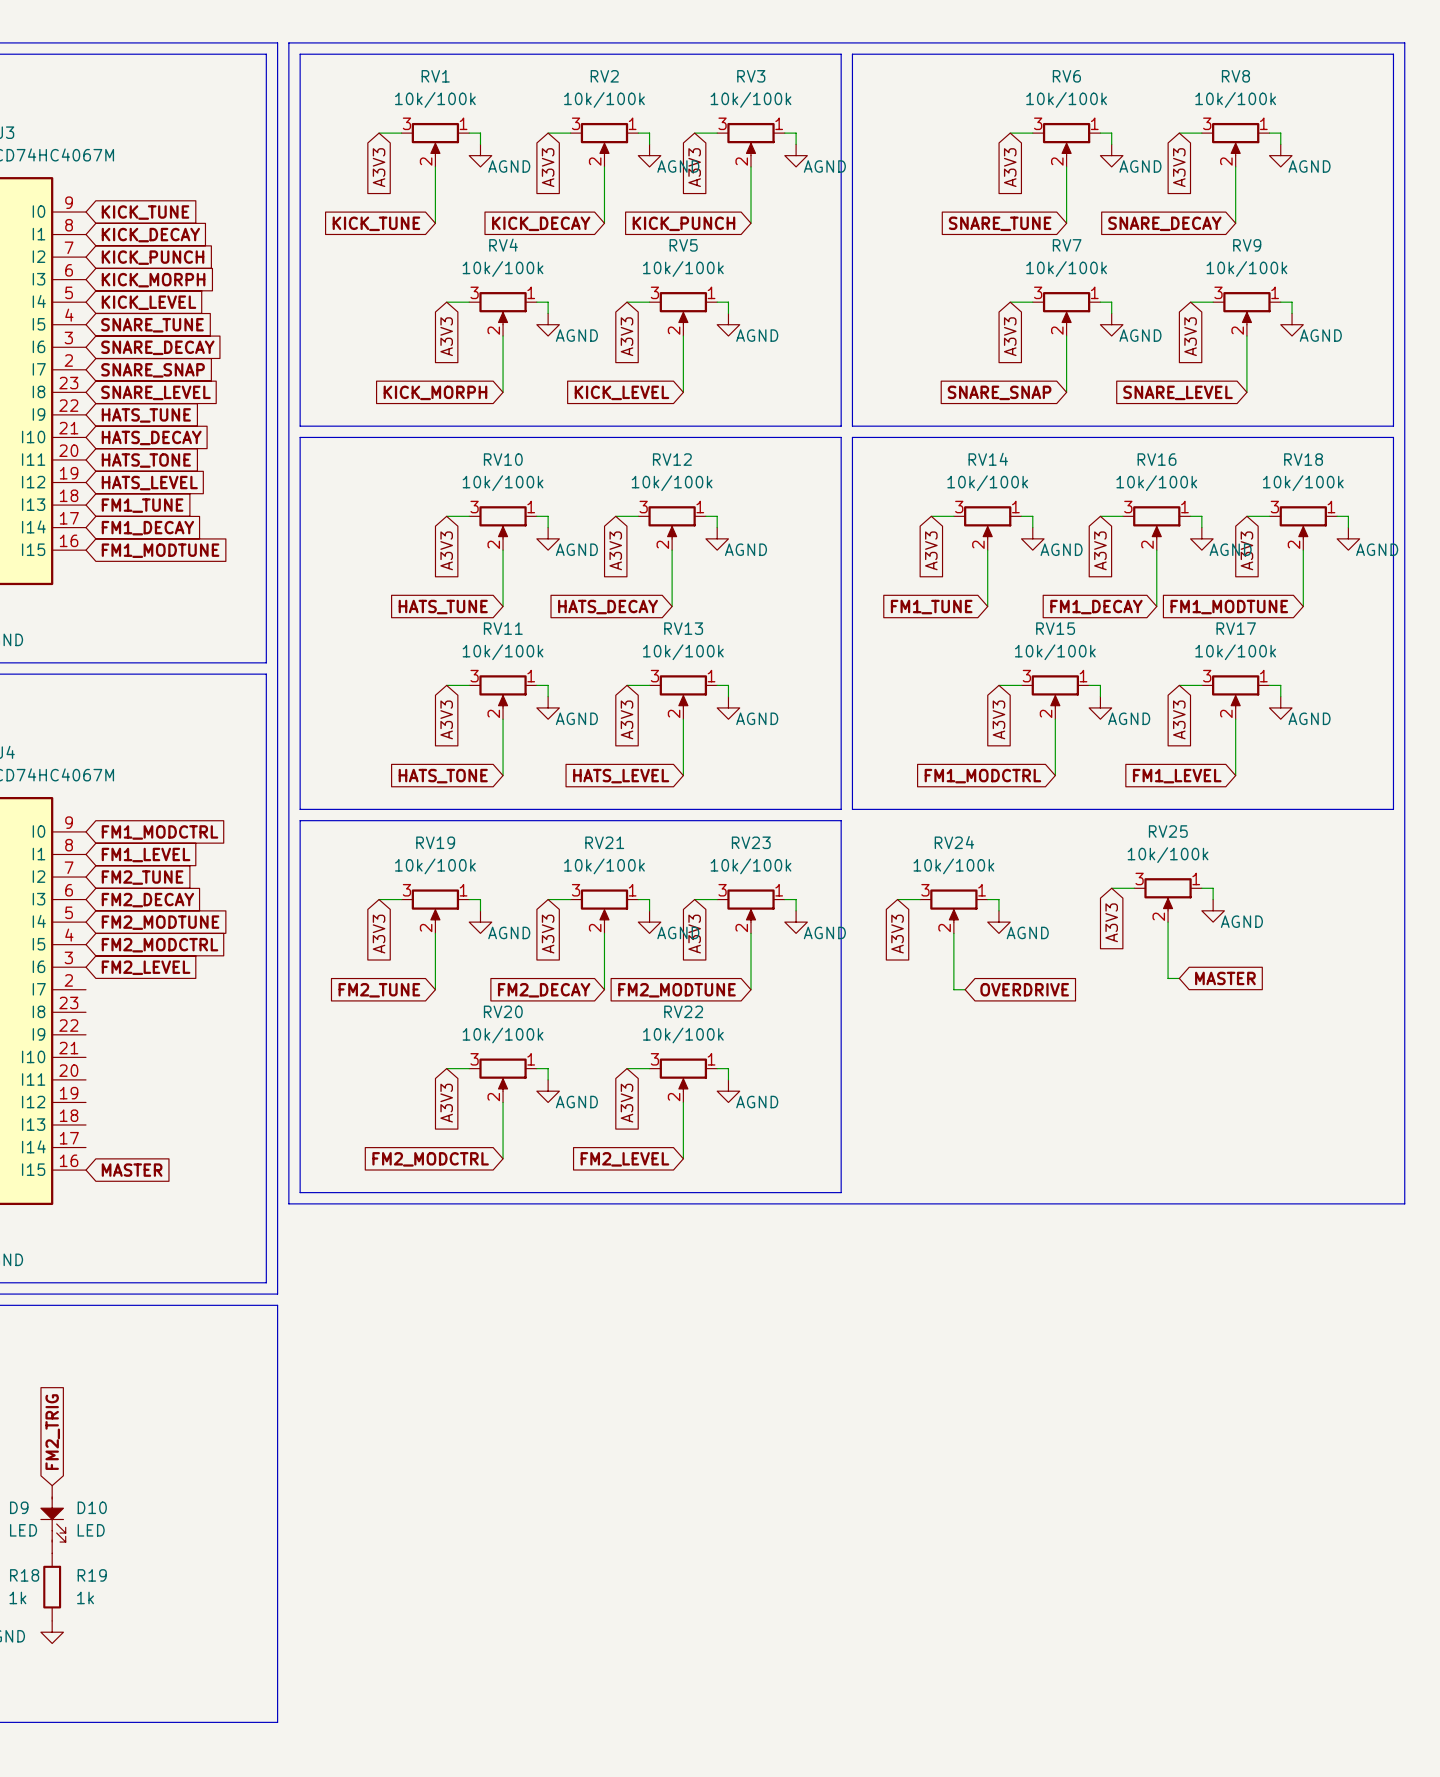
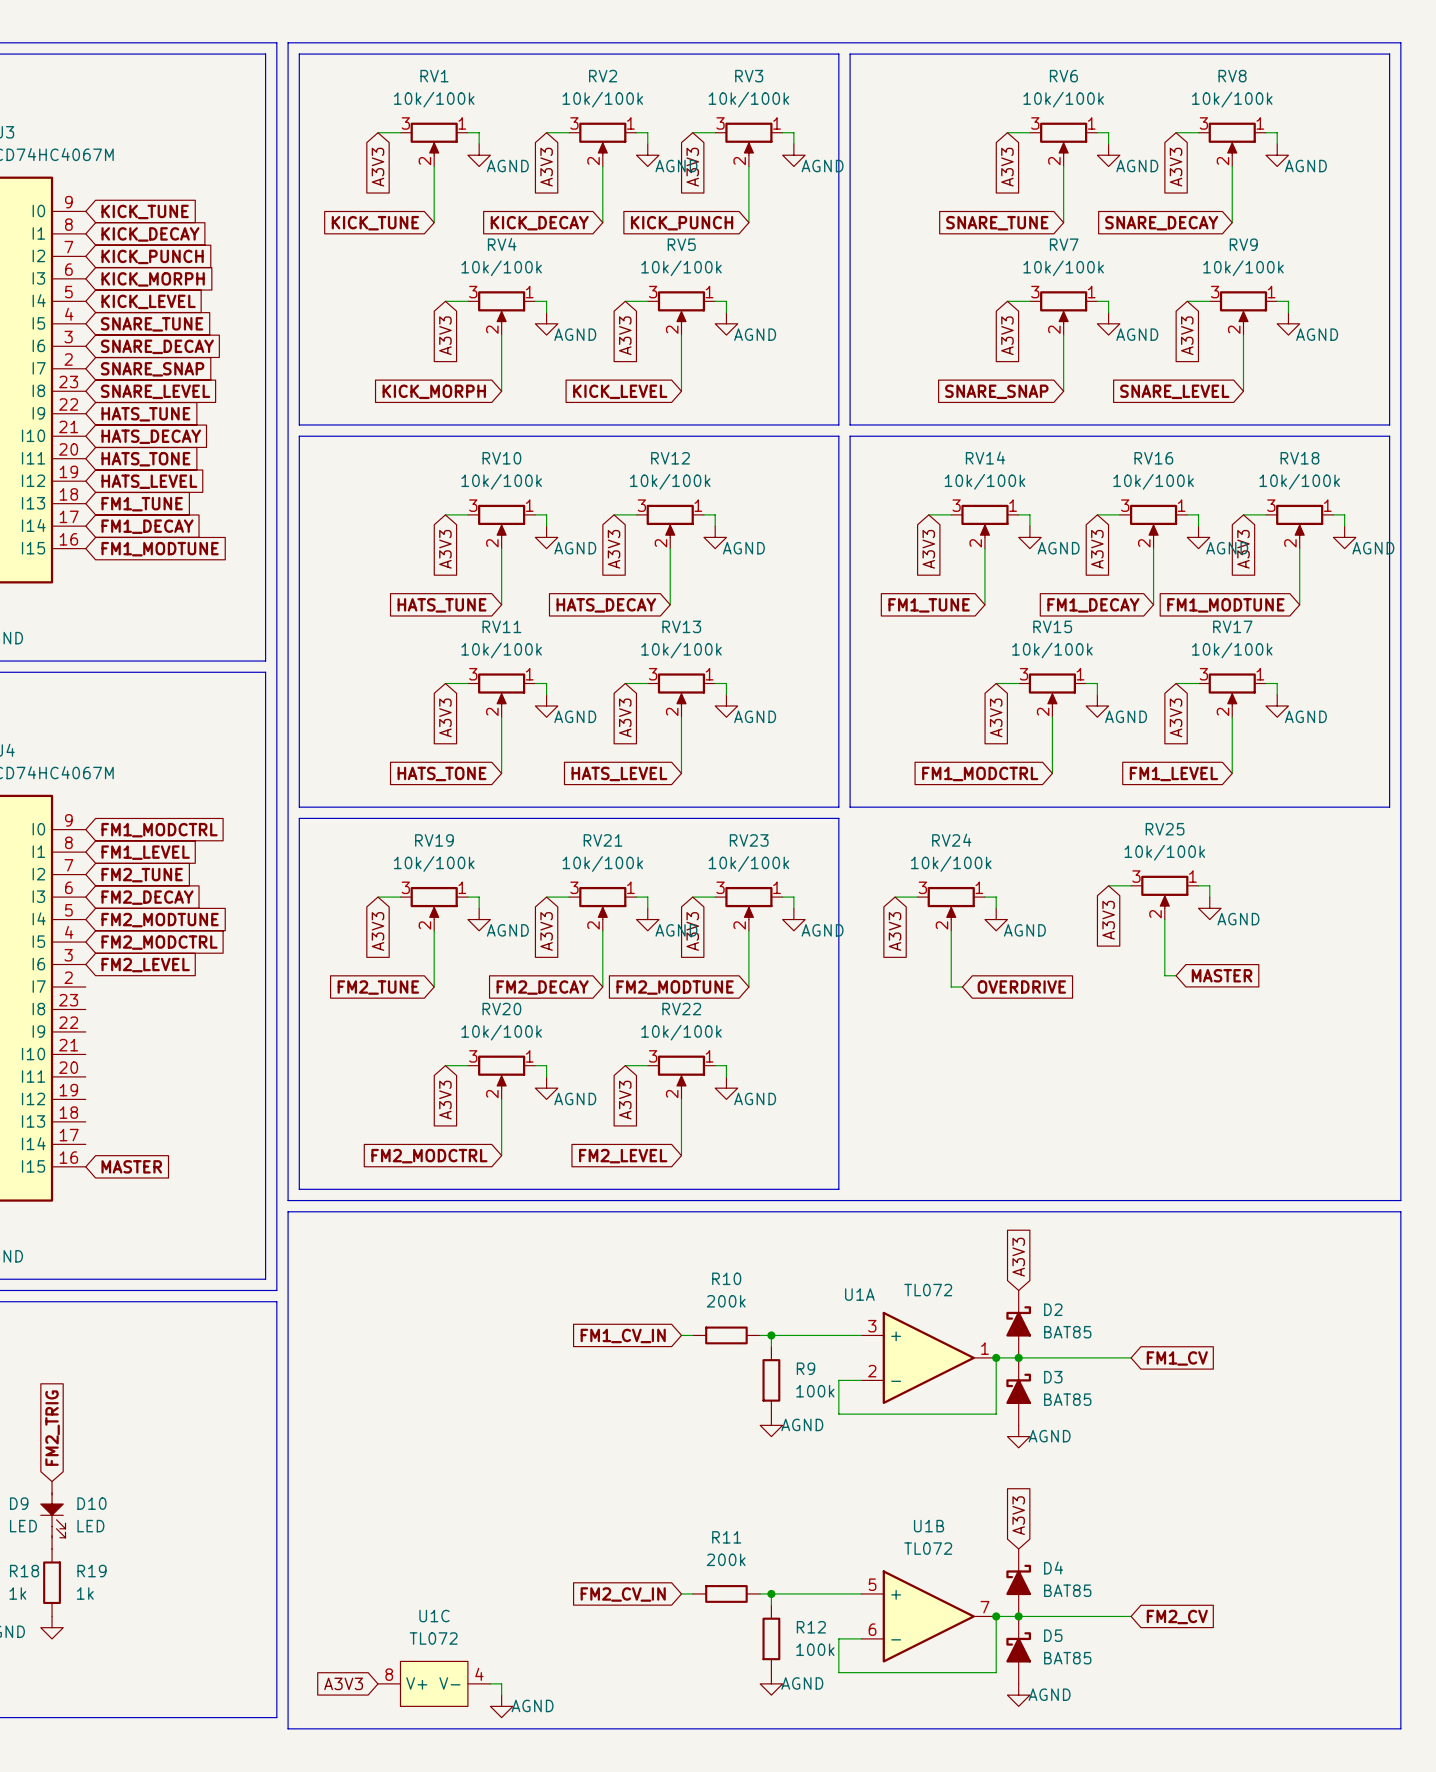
line: none -> (288, 1211) (1400, 1211) (1400, 1728) (288, 1728) (288, 1211)
global label: none -> A3V3 (1018, 1257)
D2: none -> BAT85 (1018, 1324)
global label: none -> FM1_CV_IN (623, 1335)
wire: none -> (681, 1335) (692, 1335)
R10: none -> 200k (726, 1335)
wire: none -> (760, 1335) (861, 1335)
wire: none -> (771, 1335) (771, 1346)
junction: none -> (771, 1335)
U1A: none -> TL072 (928, 1357)
junction: none -> (996, 1357)
junction: none -> (1018, 1357)
wire: none -> (1131, 1357) (996, 1357) (996, 1414) (838, 1414) (838, 1380) (861, 1380)
global label: none -> FM1_CV (1177, 1358)
R9: none -> 100k (771, 1380)
D3: none -> BAT85 (1018, 1391)
power symbol: none -> AGND (771, 1425)
power symbol: none -> AGND (1018, 1436)
global label: none -> A3V3 (1018, 1515)
D4: none -> BAT85 (1018, 1582)
global label: none -> FM2_CV_IN (623, 1594)
wire: none -> (681, 1593) (692, 1593)
R11: none -> 200k (726, 1593)
wire: none -> (760, 1593) (861, 1593)
wire: none -> (771, 1593) (771, 1605)
junction: none -> (771, 1593)
U1B: none -> TL072 (928, 1616)
junction: none -> (996, 1616)
junction: none -> (1018, 1616)
wire: none -> (1131, 1616) (996, 1616) (996, 1672) (838, 1672) (838, 1638) (861, 1638)
global label: none -> FM2_CV (1177, 1616)
R12: none -> 100k (771, 1638)
D5: none -> BAT85 (1018, 1650)
global label: none -> A3V3 (343, 1683)
U1C: none -> TL072 (434, 1683)
wire: none -> (490, 1683) (501, 1683) (501, 1695)
power symbol: none -> AGND (771, 1683)
power symbol: none -> AGND (1018, 1695)
power symbol: none -> AGND (501, 1706)

